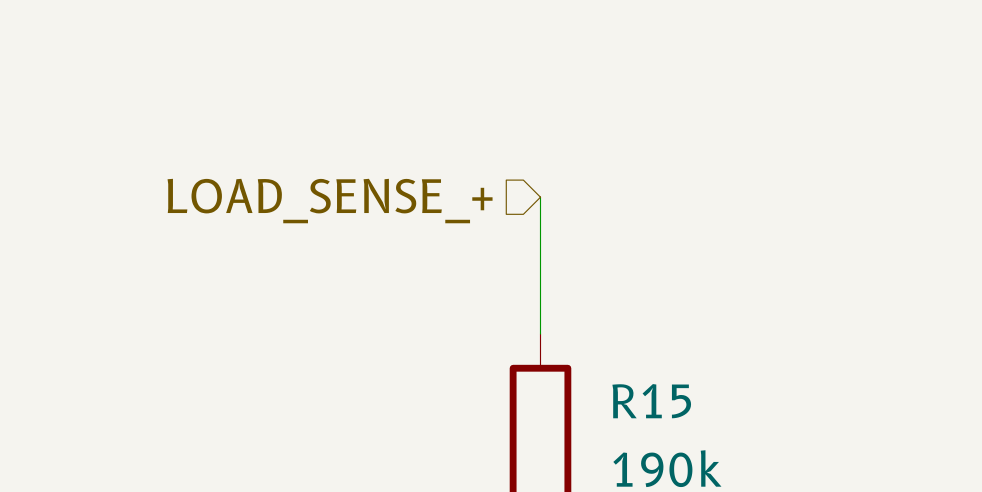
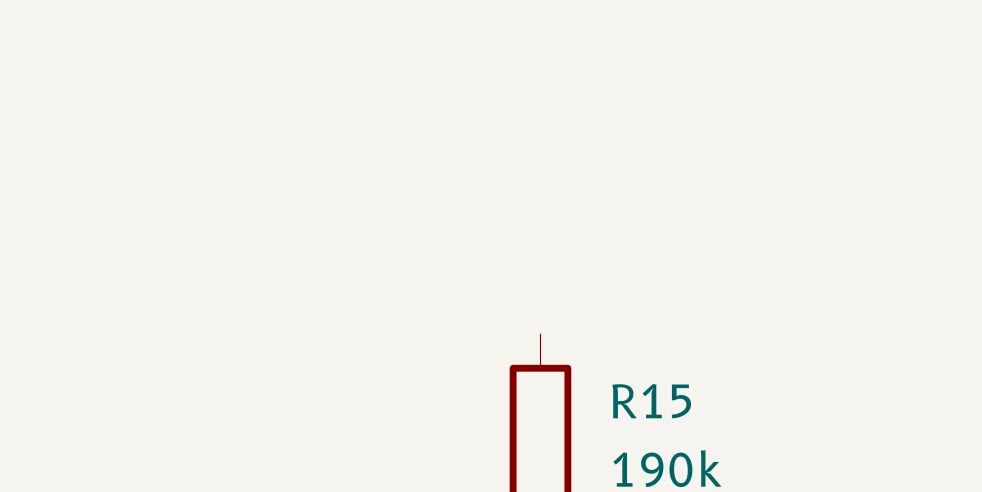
wire: (540, 197) (540, 334) -> none
hierarchical label: LOAD_SENSE_+ (330, 201) -> none

